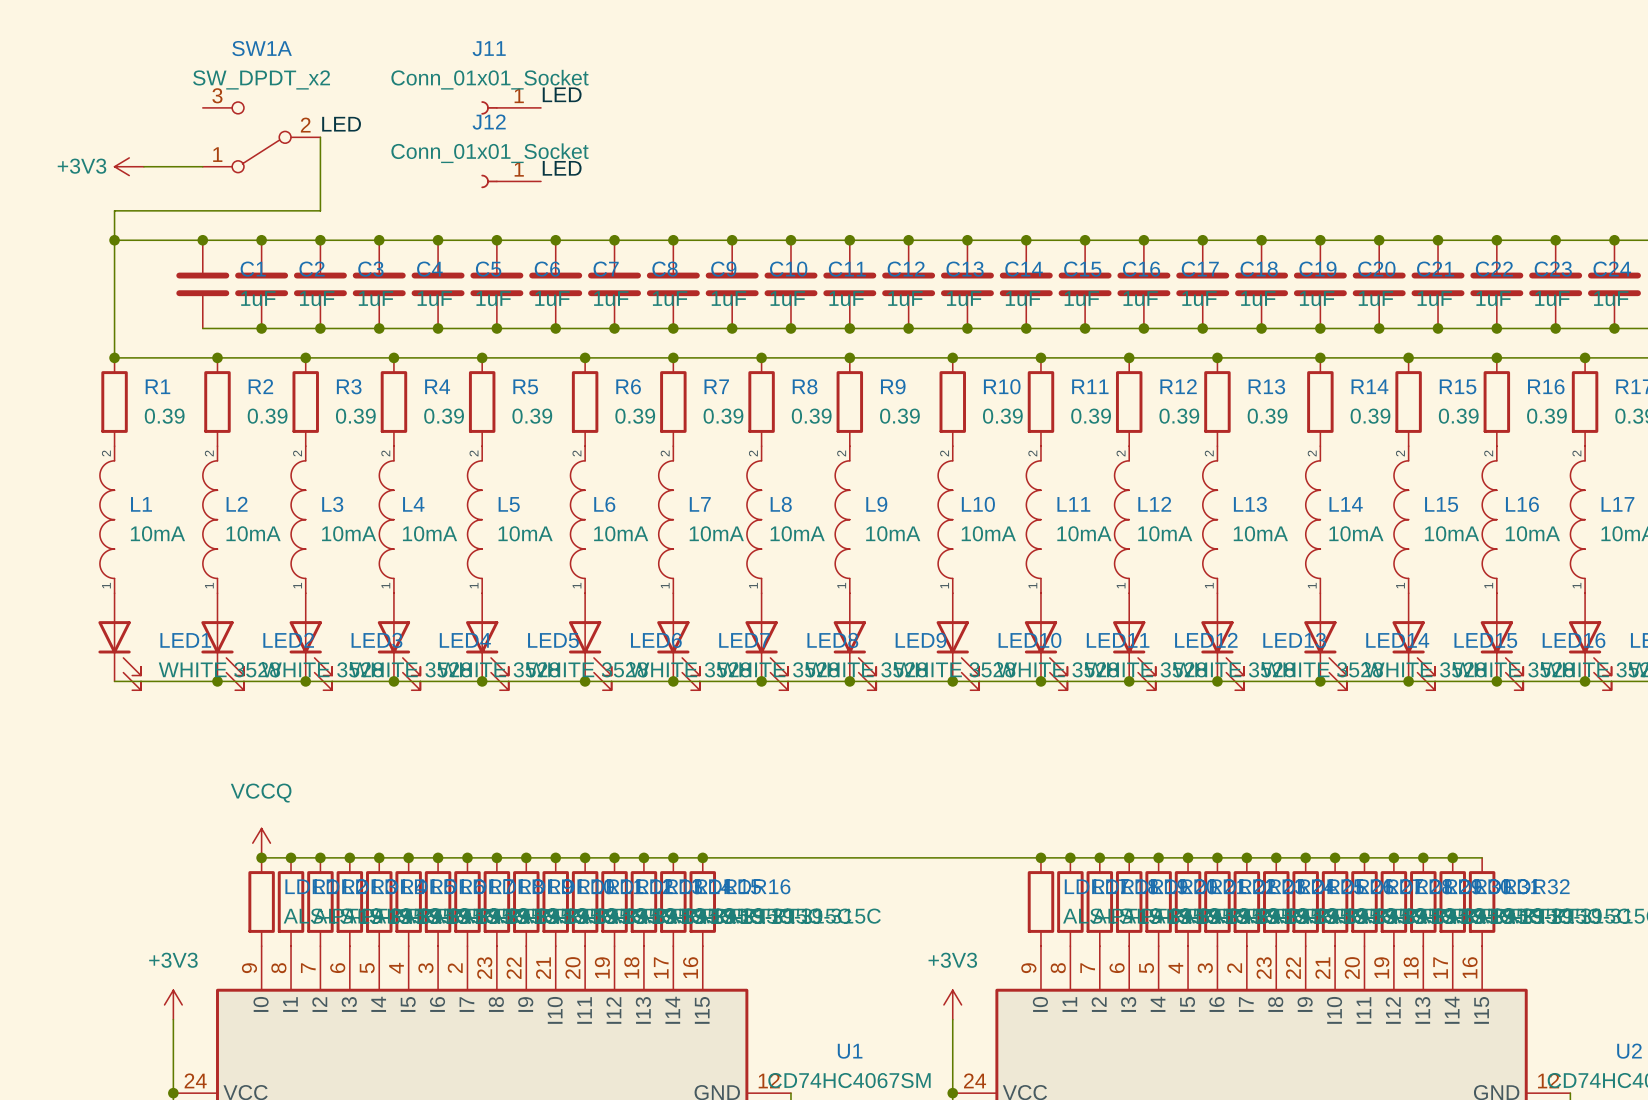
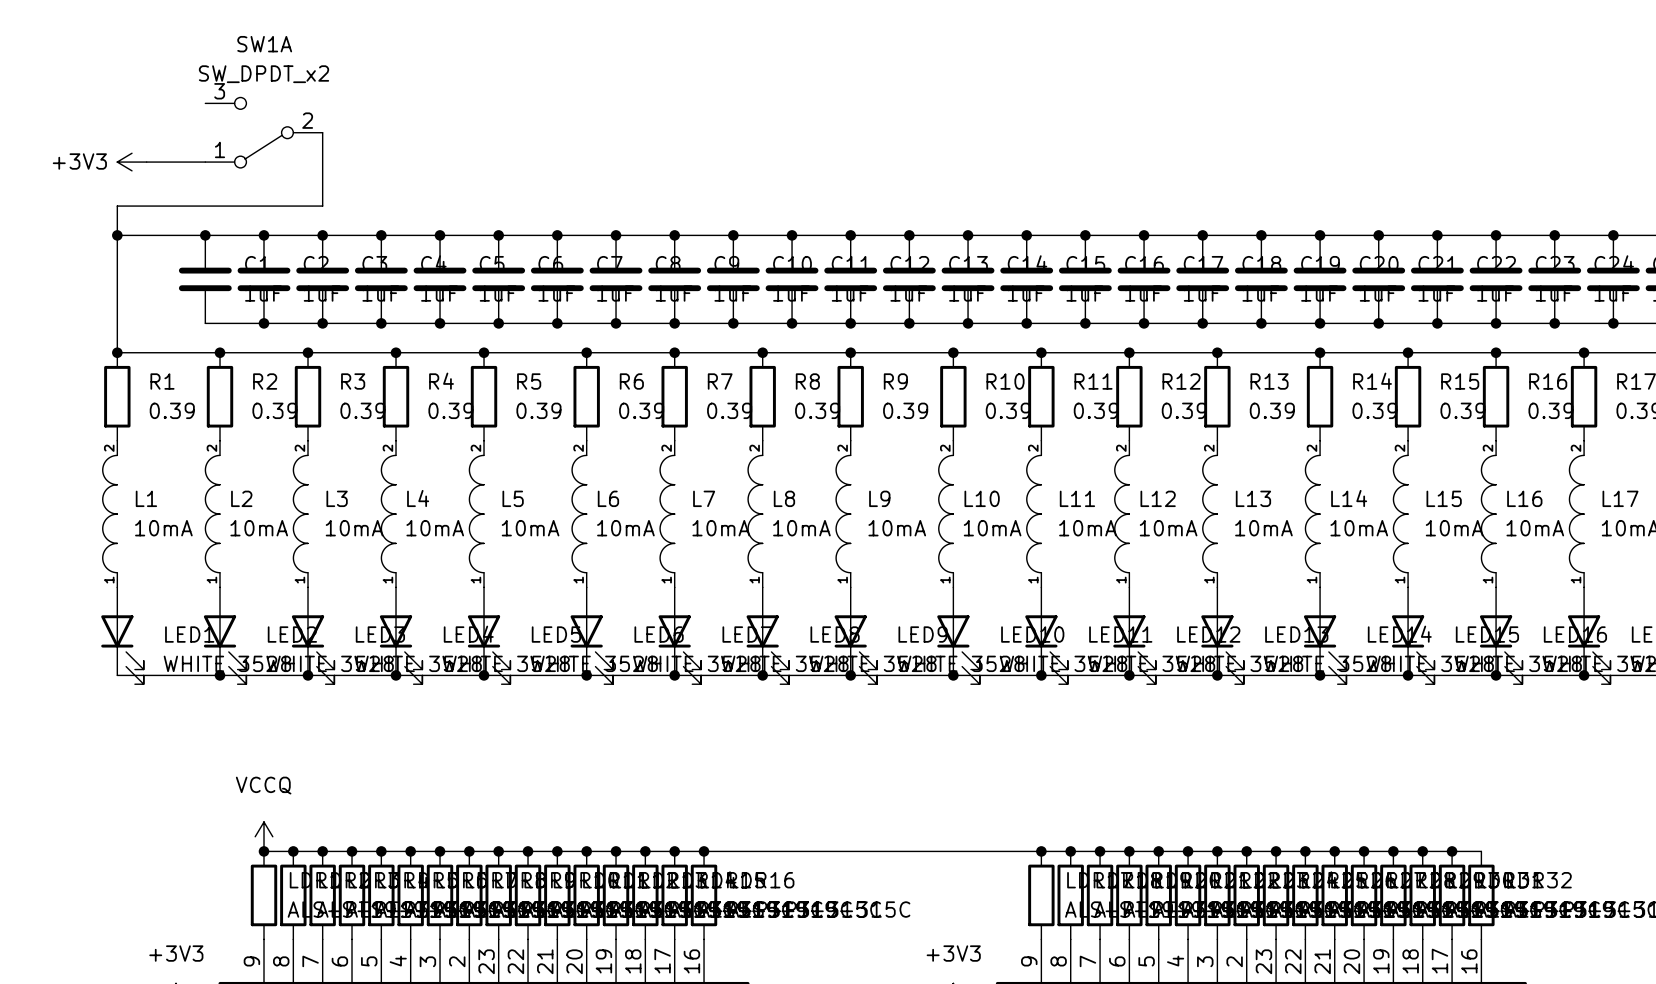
label: LED (562, 94) -> none
J11: Conn_01x01_Socket (511, 107) -> none
label: LED (341, 124) -> none
label: LED (562, 168) -> none
J12: Conn_01x01_Socket (511, 181) -> none

